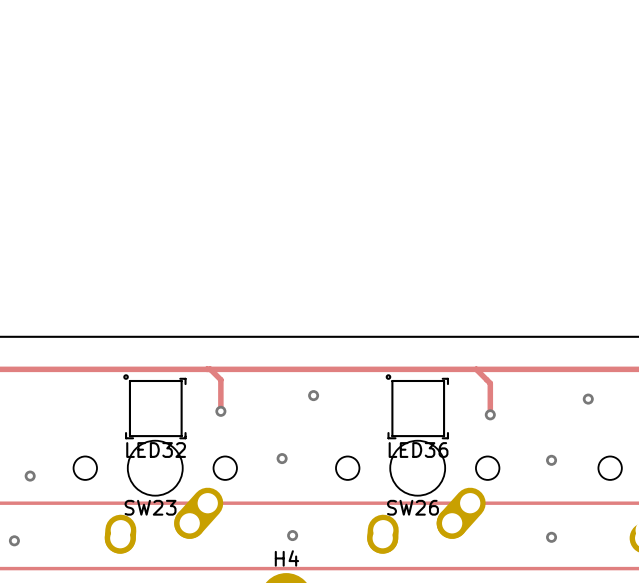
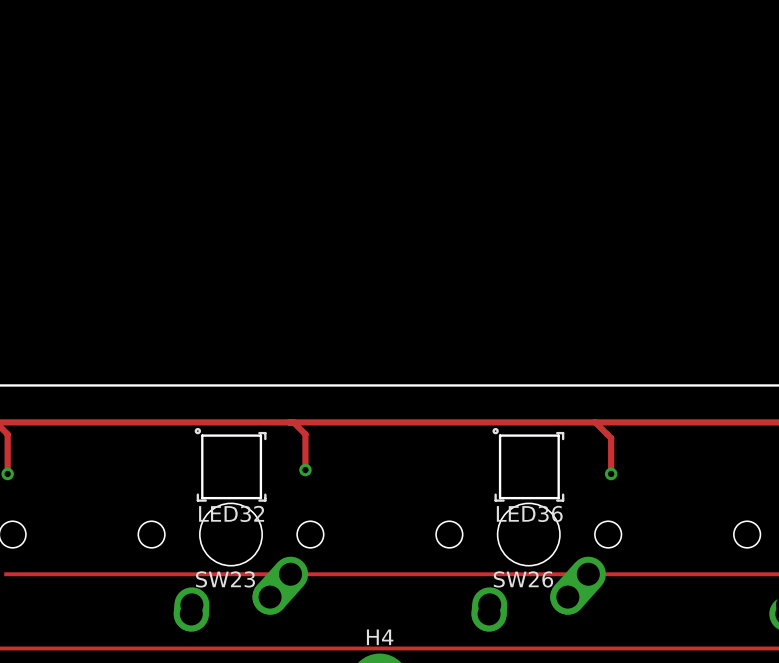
via: (313, 395) -> none
via: (588, 399) -> none
via: (282, 458) -> none
via: (551, 460) -> none
via: (30, 476) -> none
via: (292, 535) -> none
via: (551, 537) -> none
via: (14, 540) -> none

